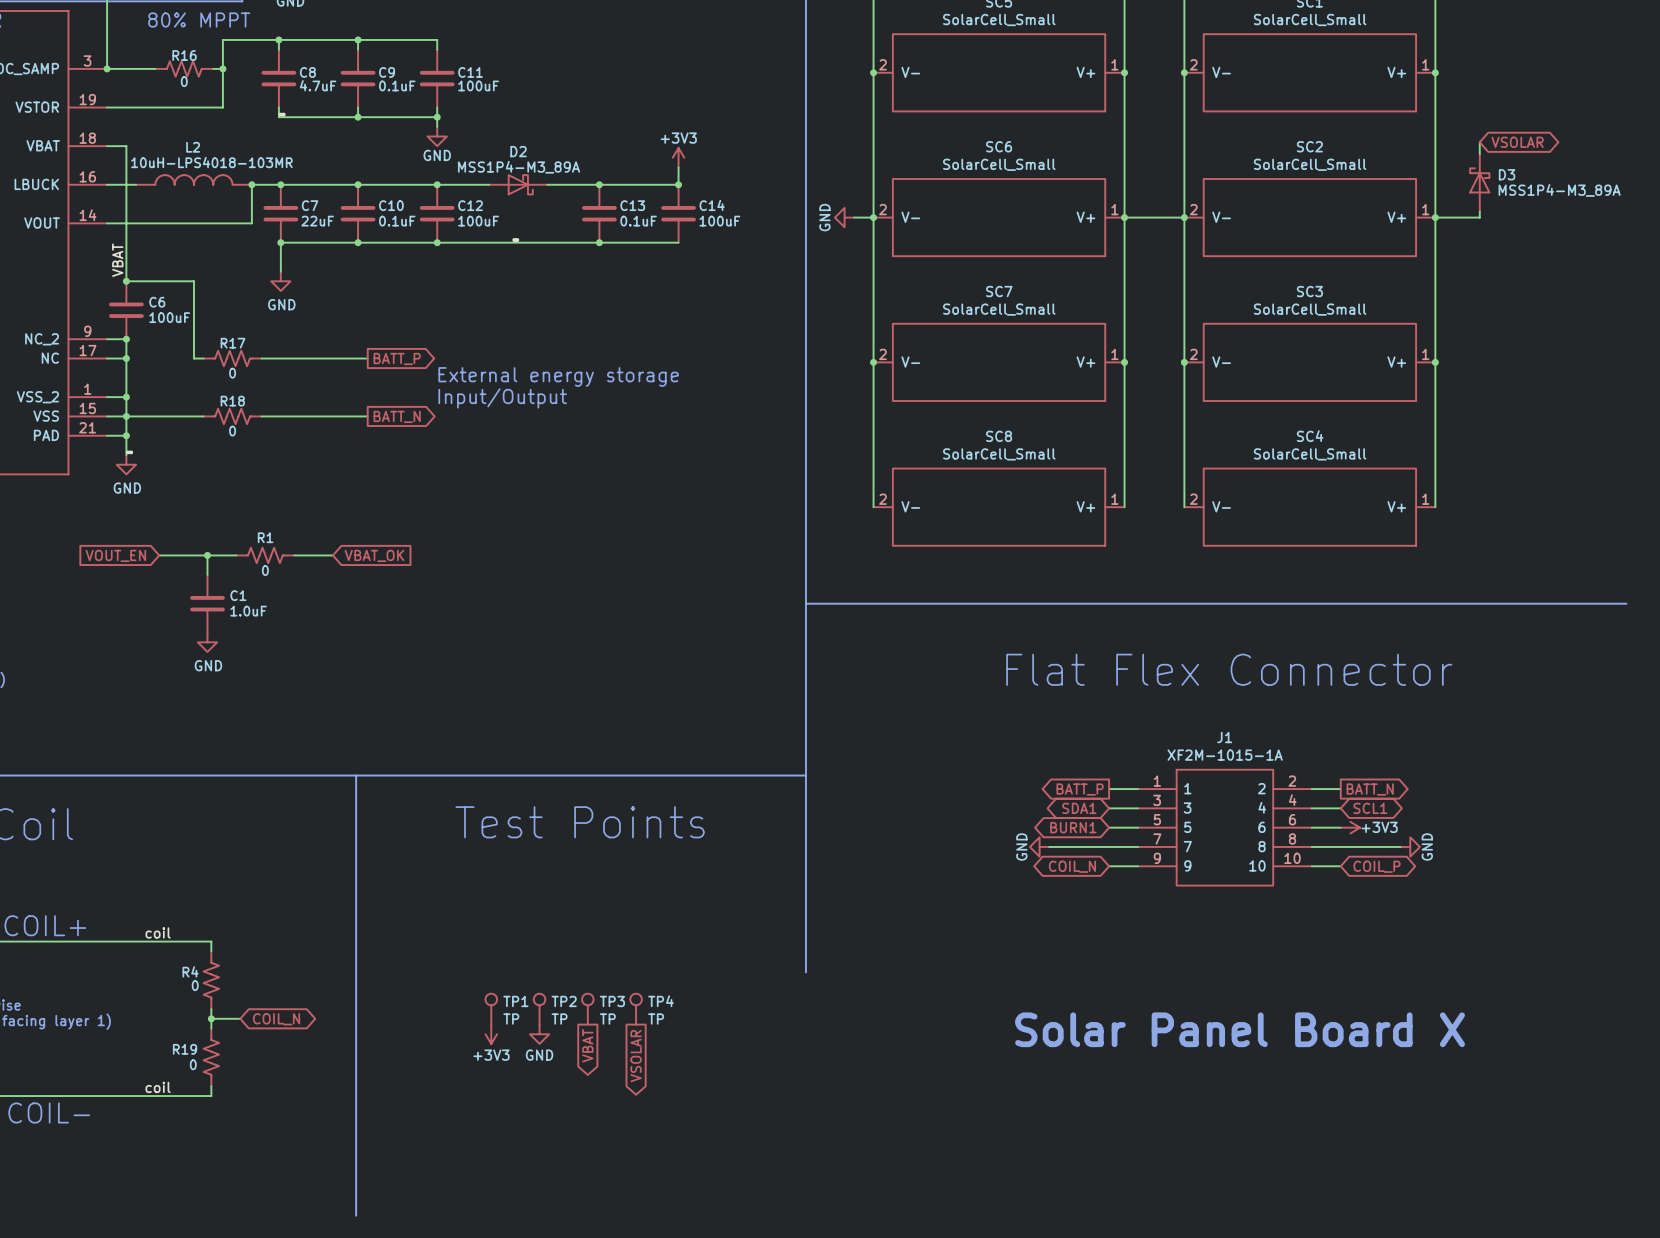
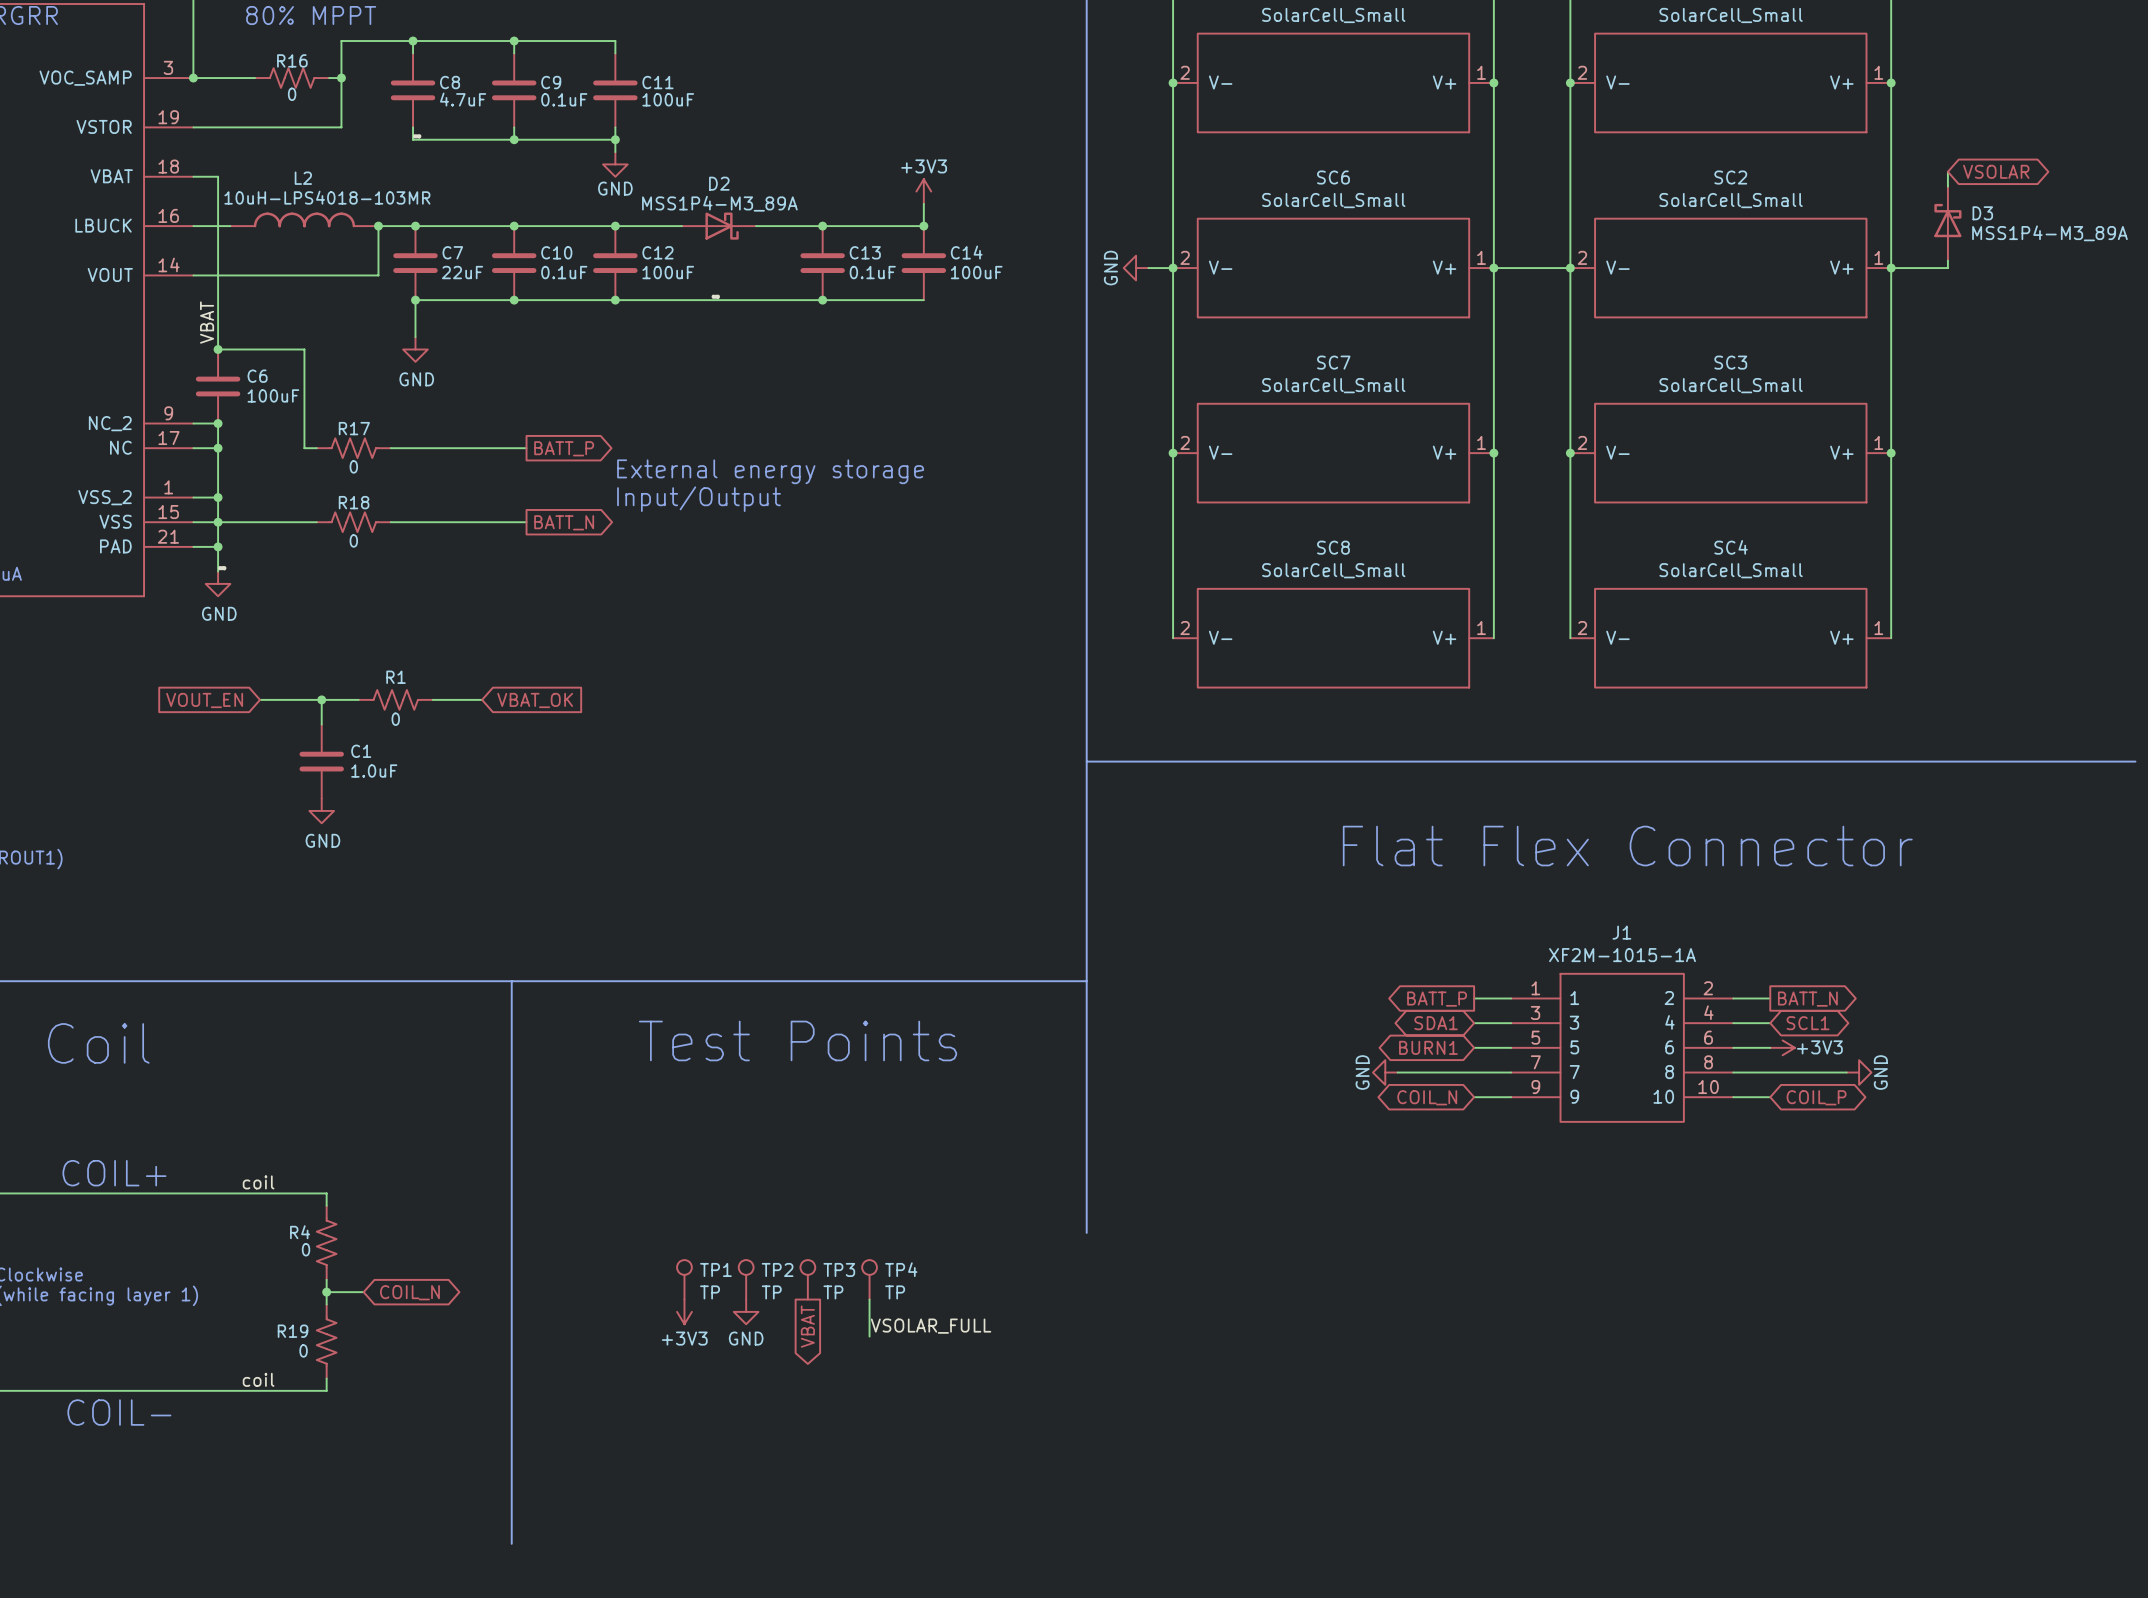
wire: none -> (869, 1299) (869, 1336)
text: Solar Panel Board X (1240, 1029) -> none
label: none -> VSOLAR_FULL (931, 1326)
global label: VSOLAR (636, 1056) -> none

